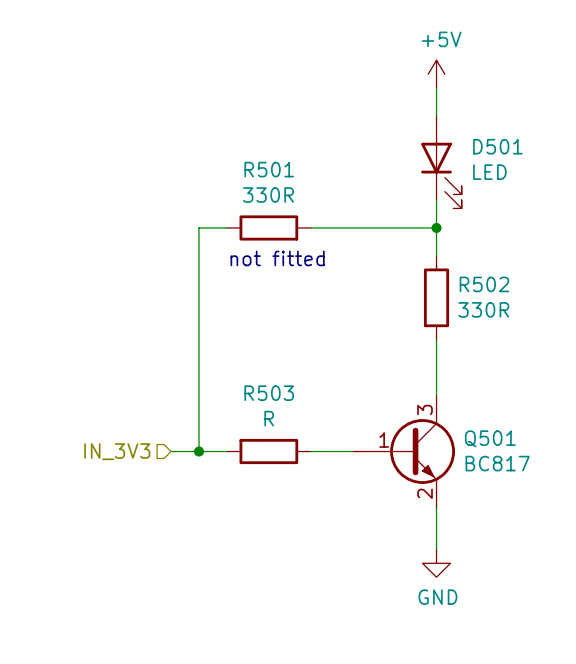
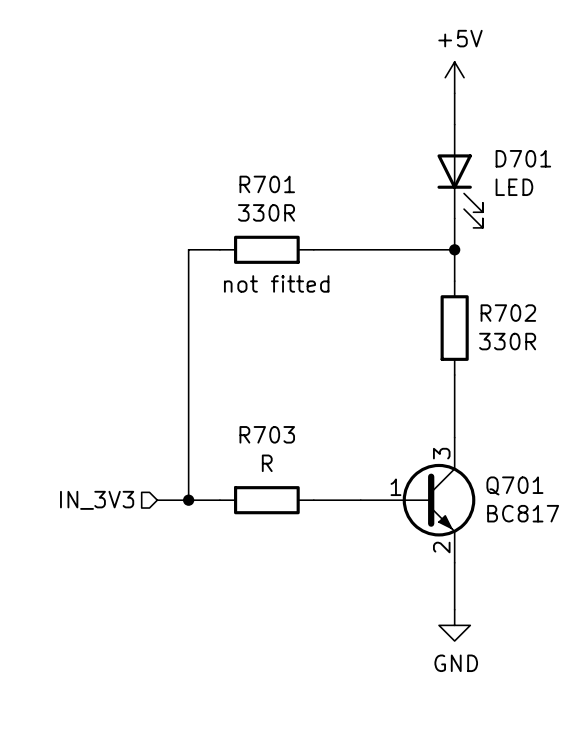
D501 name: D501 (497, 146) -> D701 (523, 158)
R501 name: R501 (269, 169) -> R701 (267, 184)
R502 name: R502 (484, 284) -> R702 (508, 313)
R503 name: R503 (269, 393) -> R703 (267, 434)
Q501 name: Q501 (490, 438) -> Q701 (514, 485)

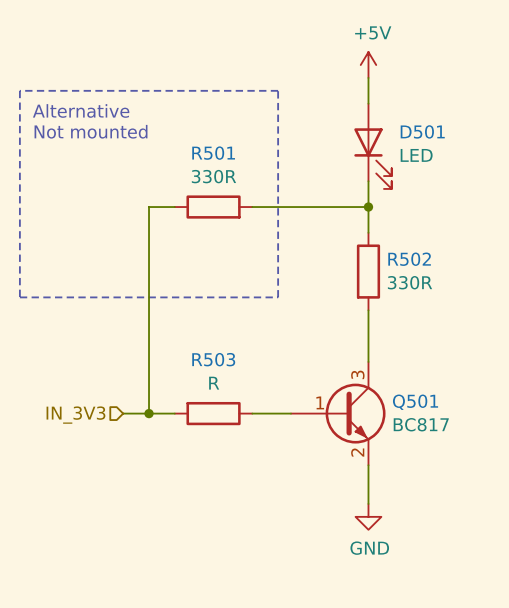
line: none -> (19, 90) (278, 90) (278, 297) (19, 297) (19, 90)
text: none -> Alternative (81, 110)
text: none -> Not mounted (91, 131)
D701 name: D701 (523, 158) -> D501 (422, 131)
R701 name: R701 (267, 184) -> R501 (213, 153)
text: not fitted (276, 283) -> none
R702 name: R702 (508, 313) -> R502 (409, 259)
R703 name: R703 (267, 434) -> R503 (213, 359)
Q701 name: Q701 (514, 485) -> Q501 (415, 402)

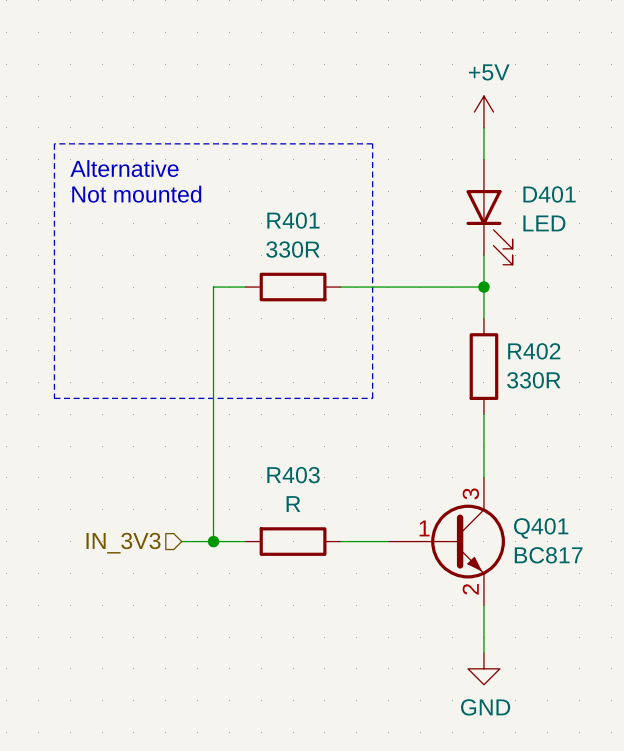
D501 name: D501 (422, 131) -> D401 (549, 194)
R501 name: R501 (213, 153) -> R401 (293, 220)
R502 name: R502 (409, 259) -> R402 (534, 351)
R503 name: R503 (213, 359) -> R403 (293, 475)
Q501 name: Q501 (415, 402) -> Q401 (541, 528)

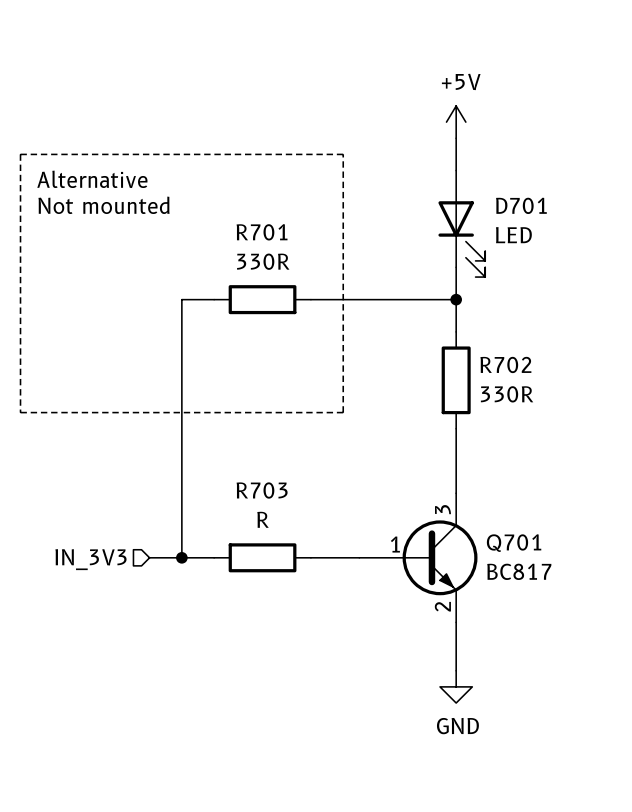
D401 name: D401 (549, 194) -> D701 (521, 205)
R401 name: R401 (293, 220) -> R701 (262, 232)
R402 name: R402 (534, 351) -> R702 (505, 364)
R403 name: R403 (293, 475) -> R703 (262, 490)
Q401 name: Q401 (541, 528) -> Q701 (514, 543)

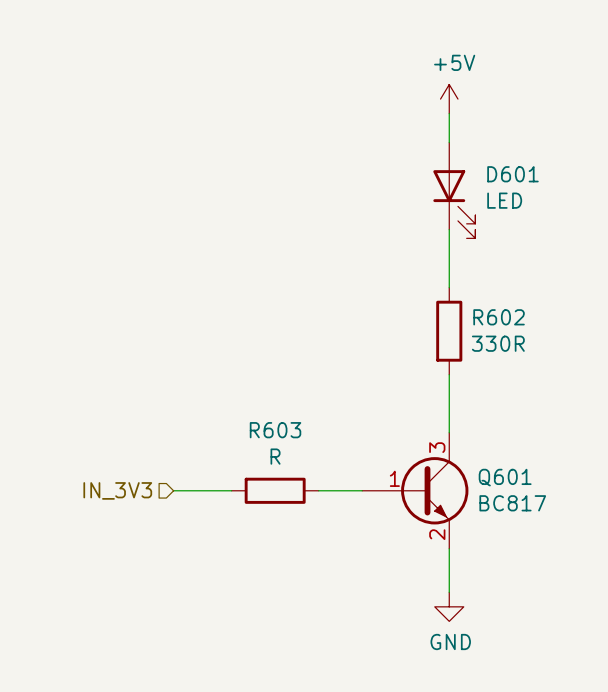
line: (20, 154) (343, 154) (343, 412) (20, 412) (20, 154) -> none
text: Alternative (92, 179) -> none
text: Not mounted (104, 205) -> none
D701 name: D701 (521, 205) -> D601 (512, 174)
wire: (214, 299) (181, 299) (181, 557) -> none
R701: 330R (262, 299) -> none
wire: (310, 299) (456, 299) -> none
junction: (456, 299) -> none
R702 name: R702 (505, 364) -> R602 (499, 317)
R703 name: R703 (262, 490) -> R603 (275, 430)
Q701 name: Q701 (514, 543) -> Q601 (505, 477)
junction: (181, 557) -> none

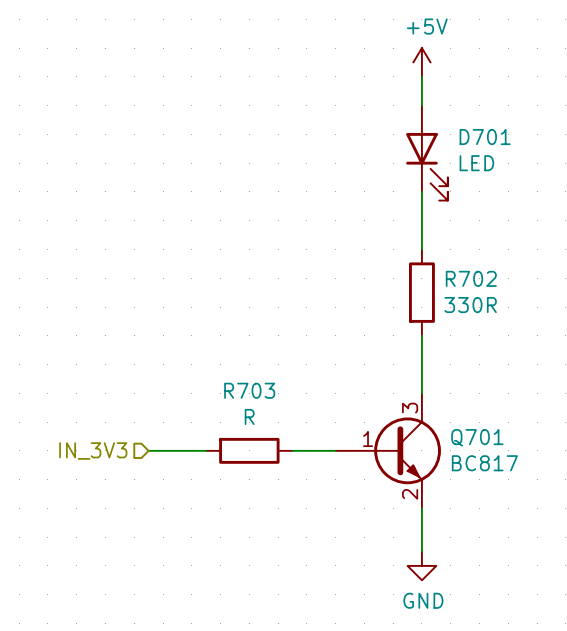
D601 name: D601 (512, 174) -> D701 (485, 137)
R602 name: R602 (499, 317) -> R702 (471, 278)
R603 name: R603 (275, 430) -> R703 (249, 390)
Q601 name: Q601 (505, 477) -> Q701 (477, 437)

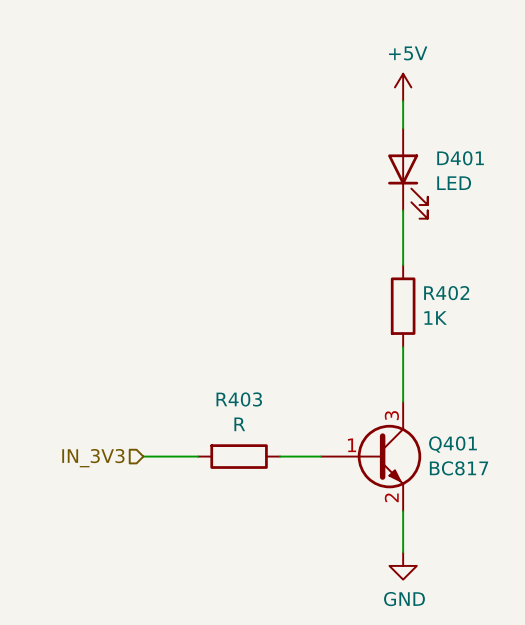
D701 name: D701 (485, 137) -> D401 (460, 158)
R702 name: R702 (471, 278) -> R402 (446, 293)
R702 value: 330R (470, 305) -> 1K (435, 317)
R703 name: R703 (249, 390) -> R403 (239, 399)
Q701 name: Q701 (477, 437) -> Q401 (452, 444)

